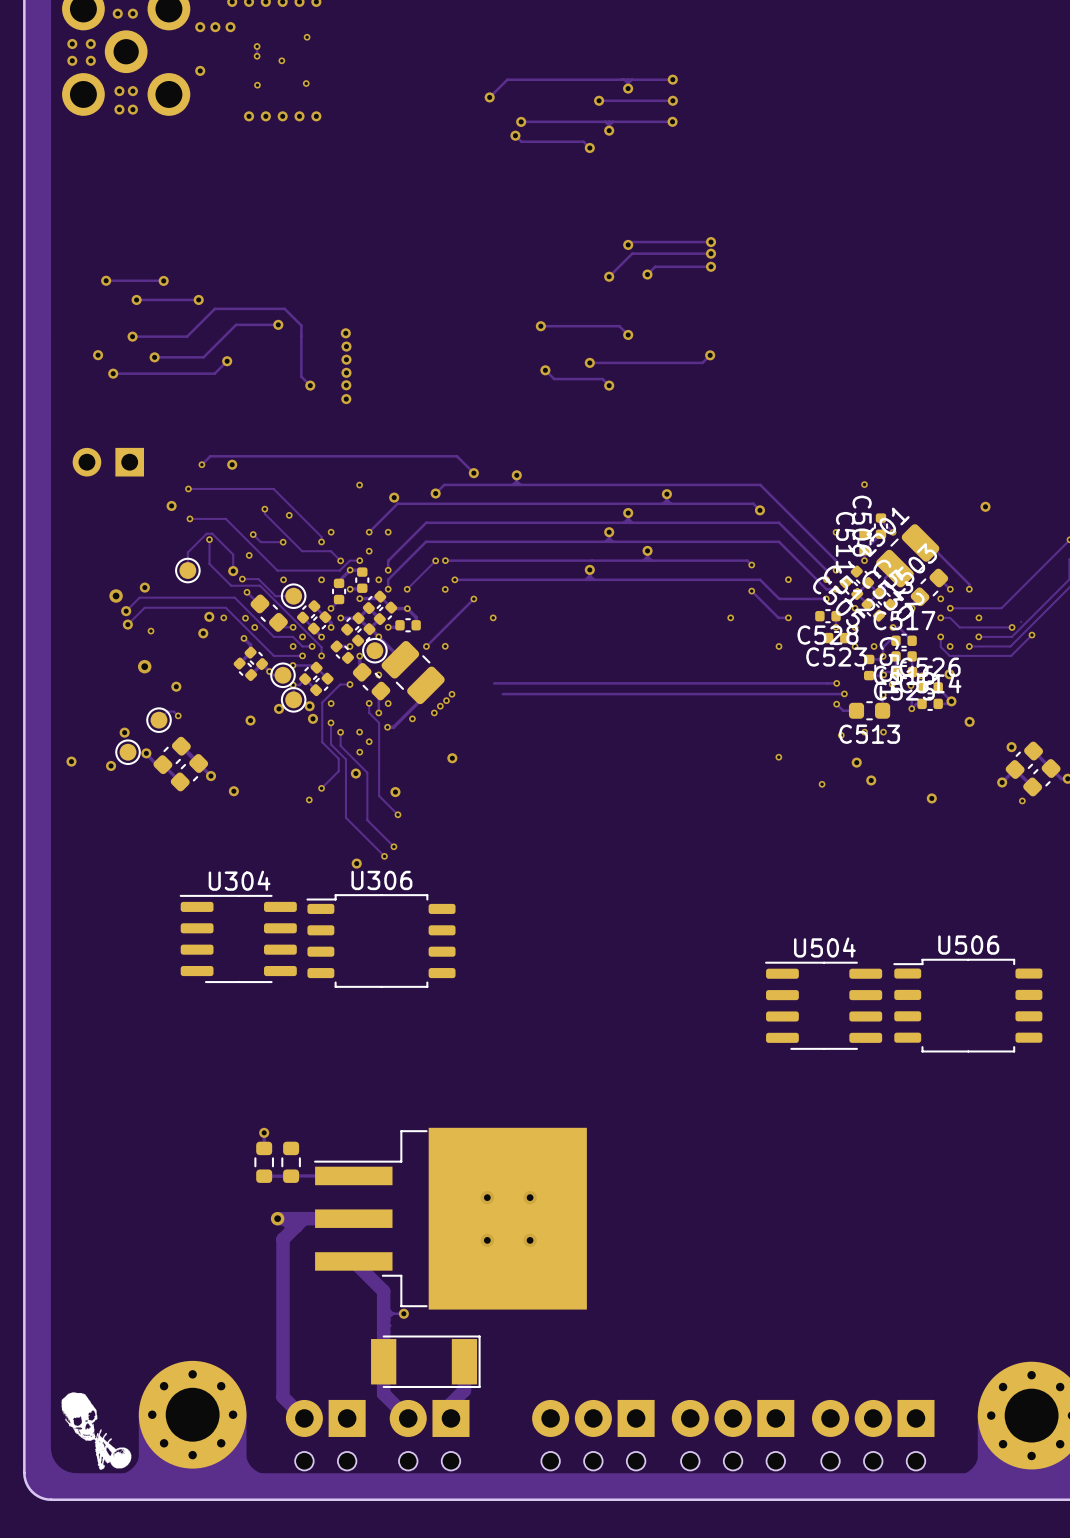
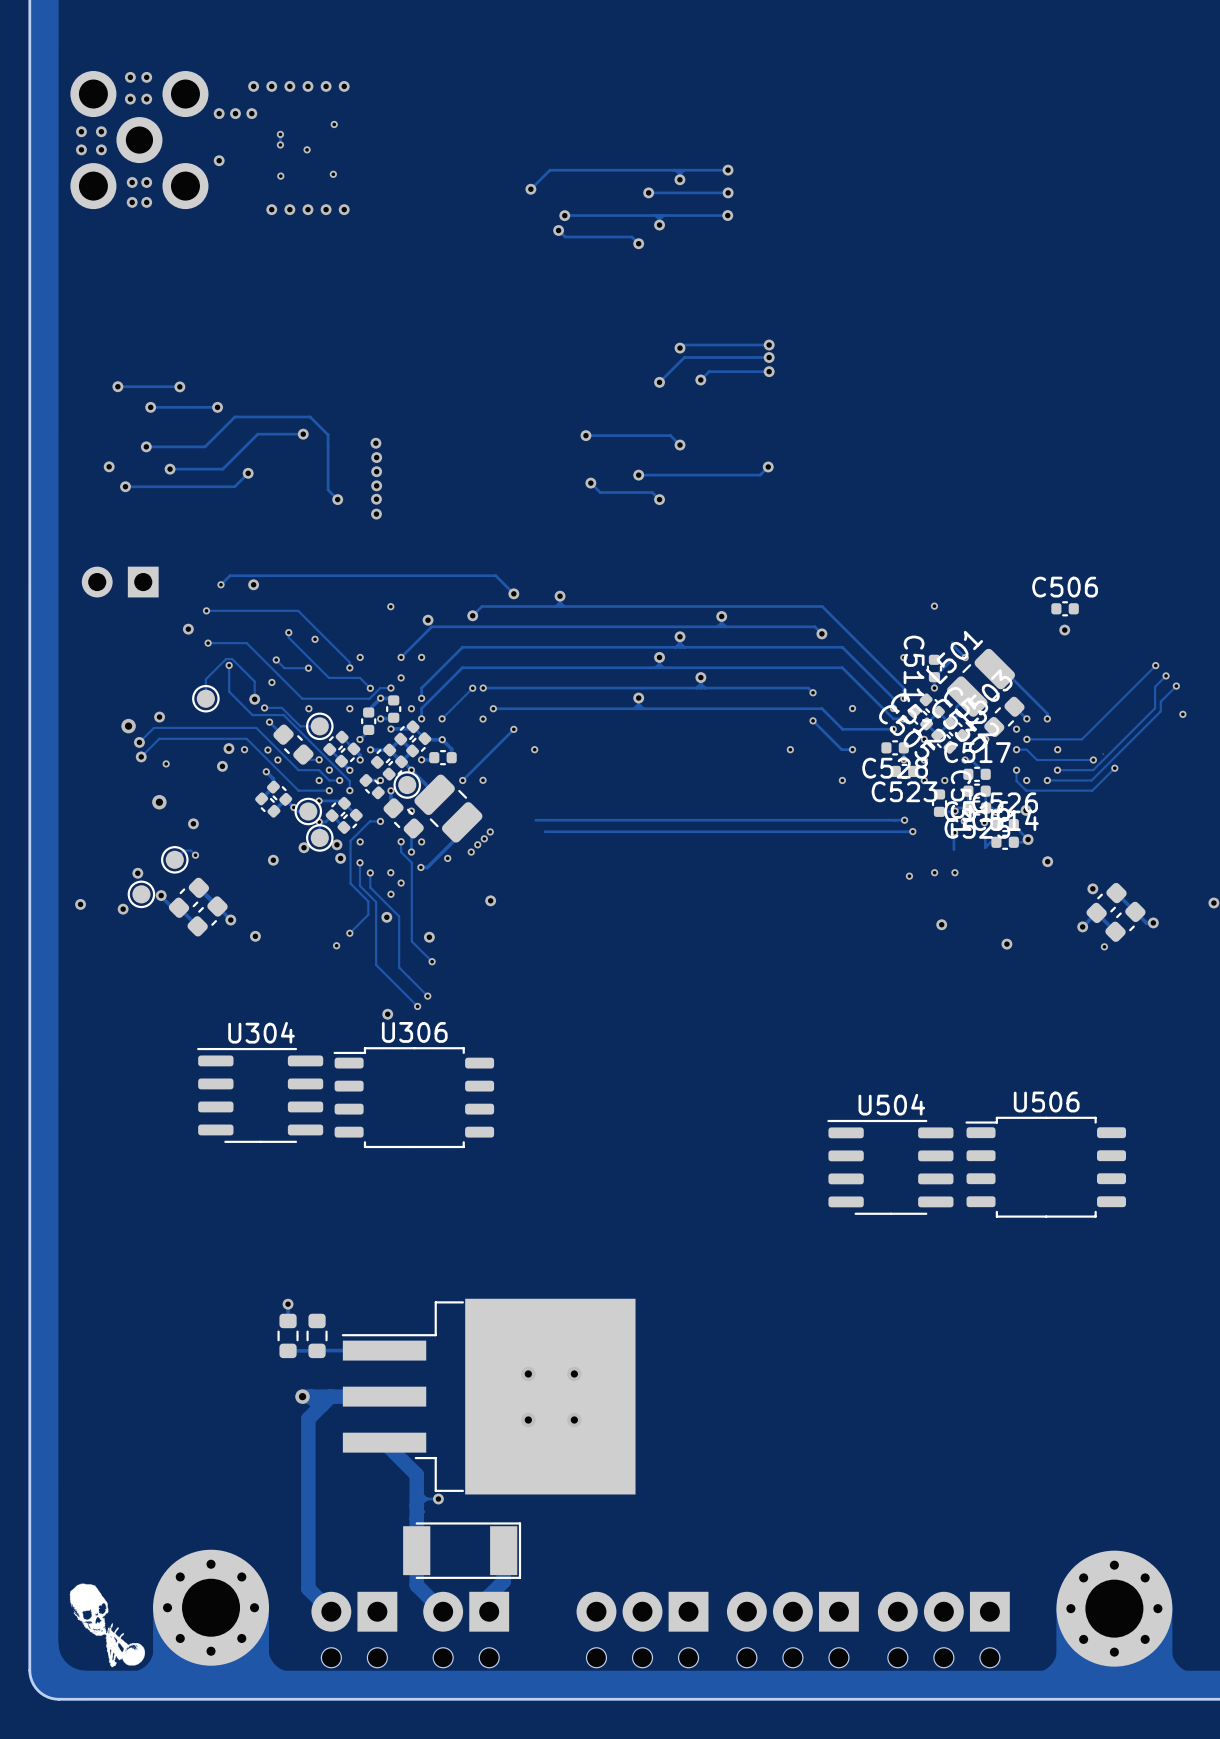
C506 rotation: 0° (880, 526) -> 90° clockwise (1065, 608)
C506 position: (880, 526) -> (1065, 608)
track: (895, 640) (889, 640) (883, 647) (883, 656) (879, 659) (869, 659) -> none
via: (883, 656) -> none
track: (836, 704) (843, 710) (856, 710) -> none
via: (836, 704) -> none
via: (911, 708) -> none
C513: (869, 710) -> none
via: (778, 757) -> none
via: (856, 762) -> none
via: (822, 784) -> none

